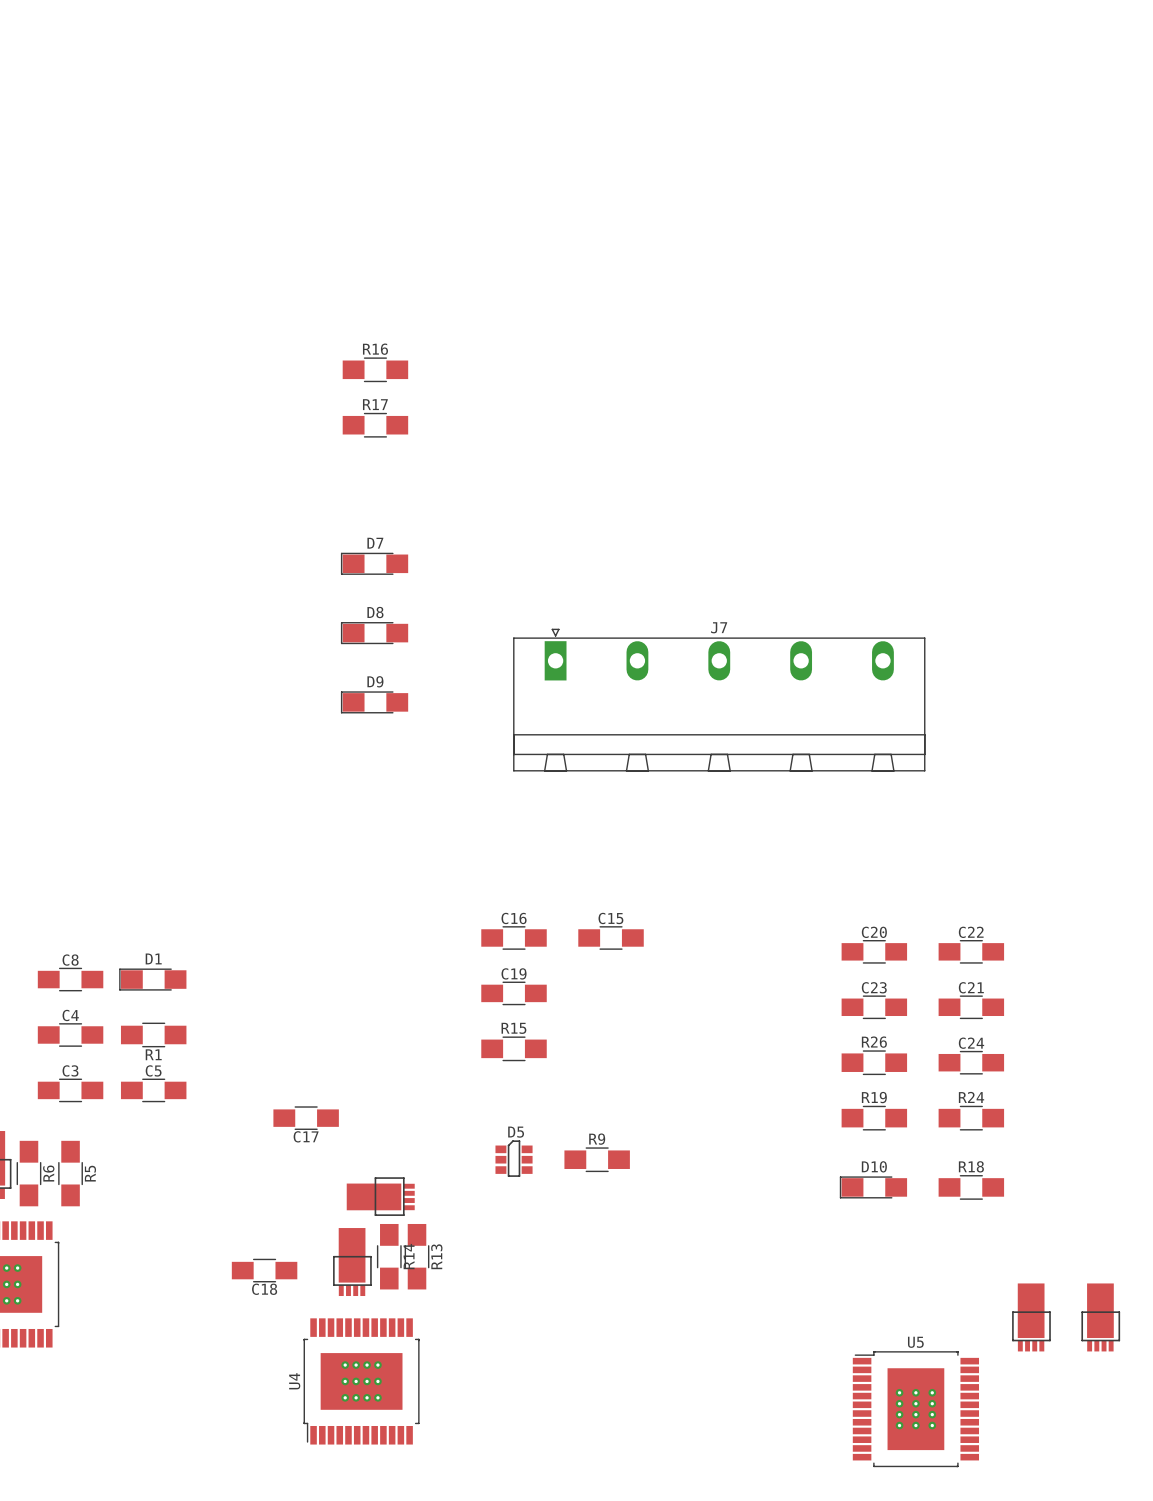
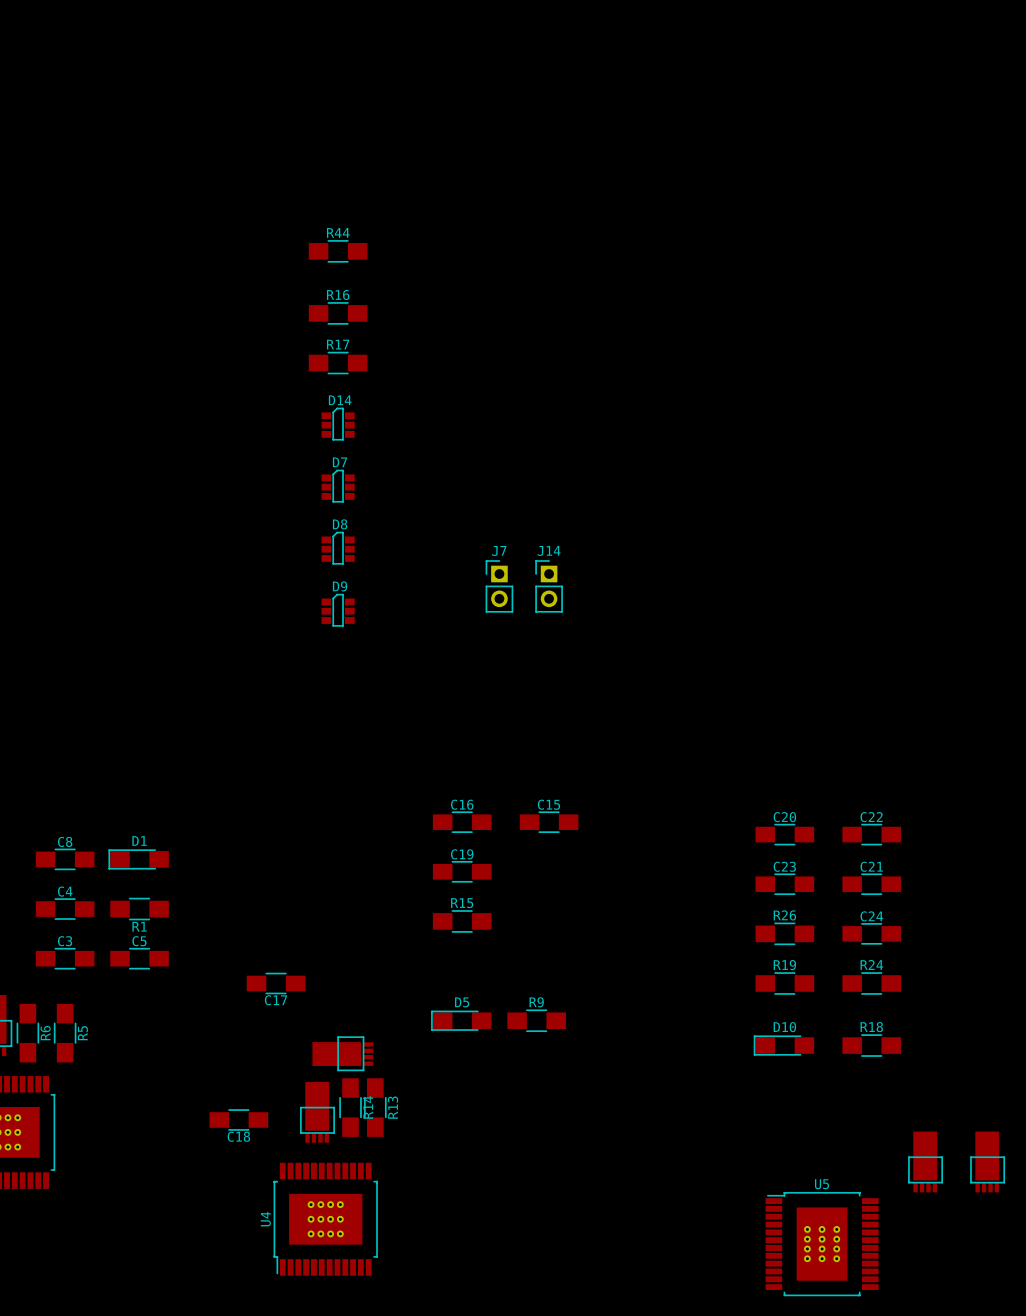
R44: none -> (338, 251)
D14: none -> (338, 424)
D7 footprint: [340, 552, 409, 575] -> [321, 469, 355, 503]
D8 footprint: [340, 622, 409, 645] -> [321, 531, 355, 565]
J7 name position: J7 (719, 627) -> J7 (499, 550)
J7 footprint: [513, 628, 926, 772] -> [485, 560, 514, 613]
J14: none -> (549, 586)
D9 footprint: [340, 691, 409, 714] -> [321, 593, 355, 627]
D5 footprint: [495, 1140, 533, 1177] -> [431, 1010, 492, 1031]

